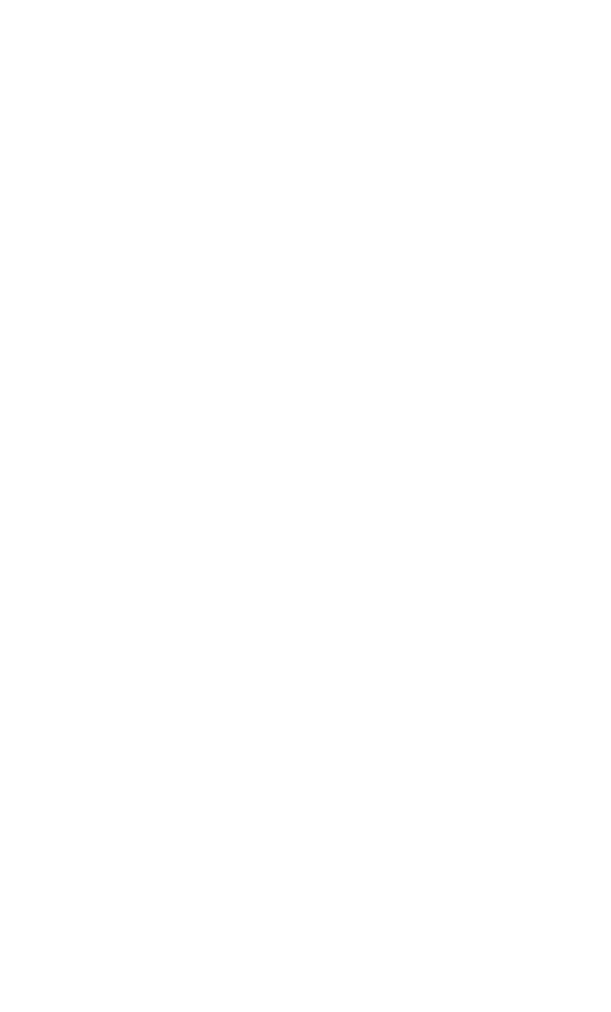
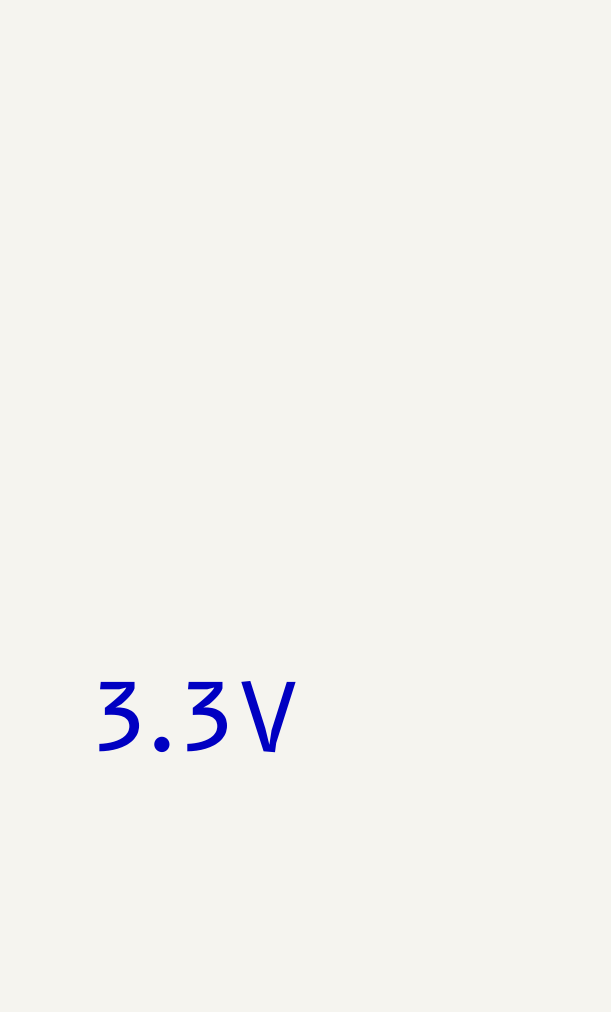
text: none -> 3.3V (197, 716)

